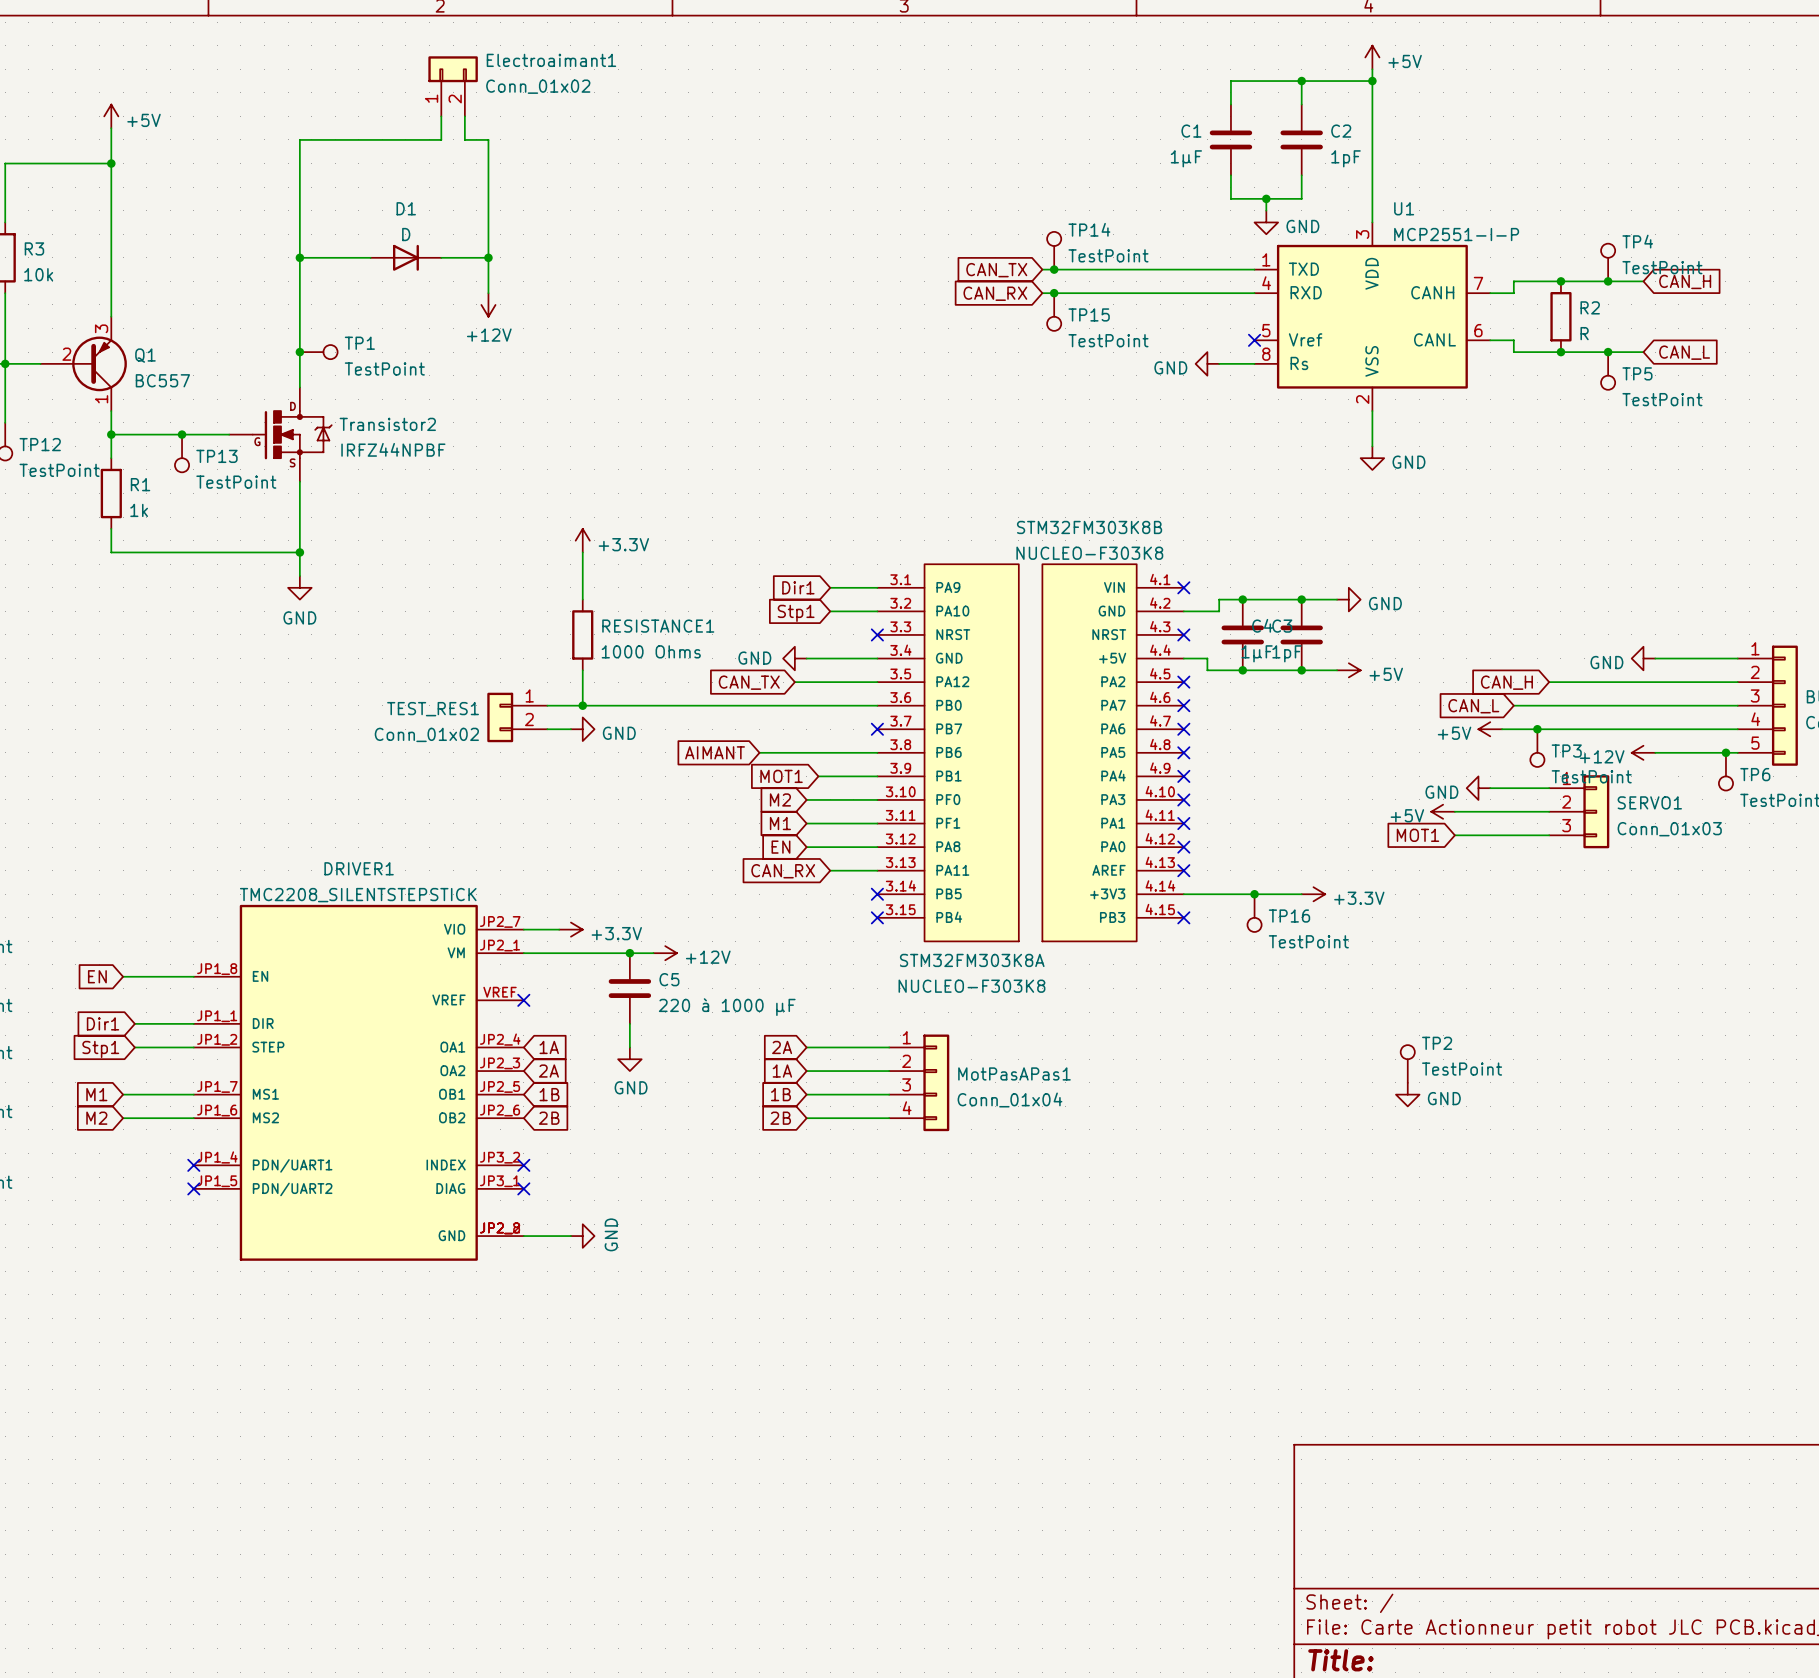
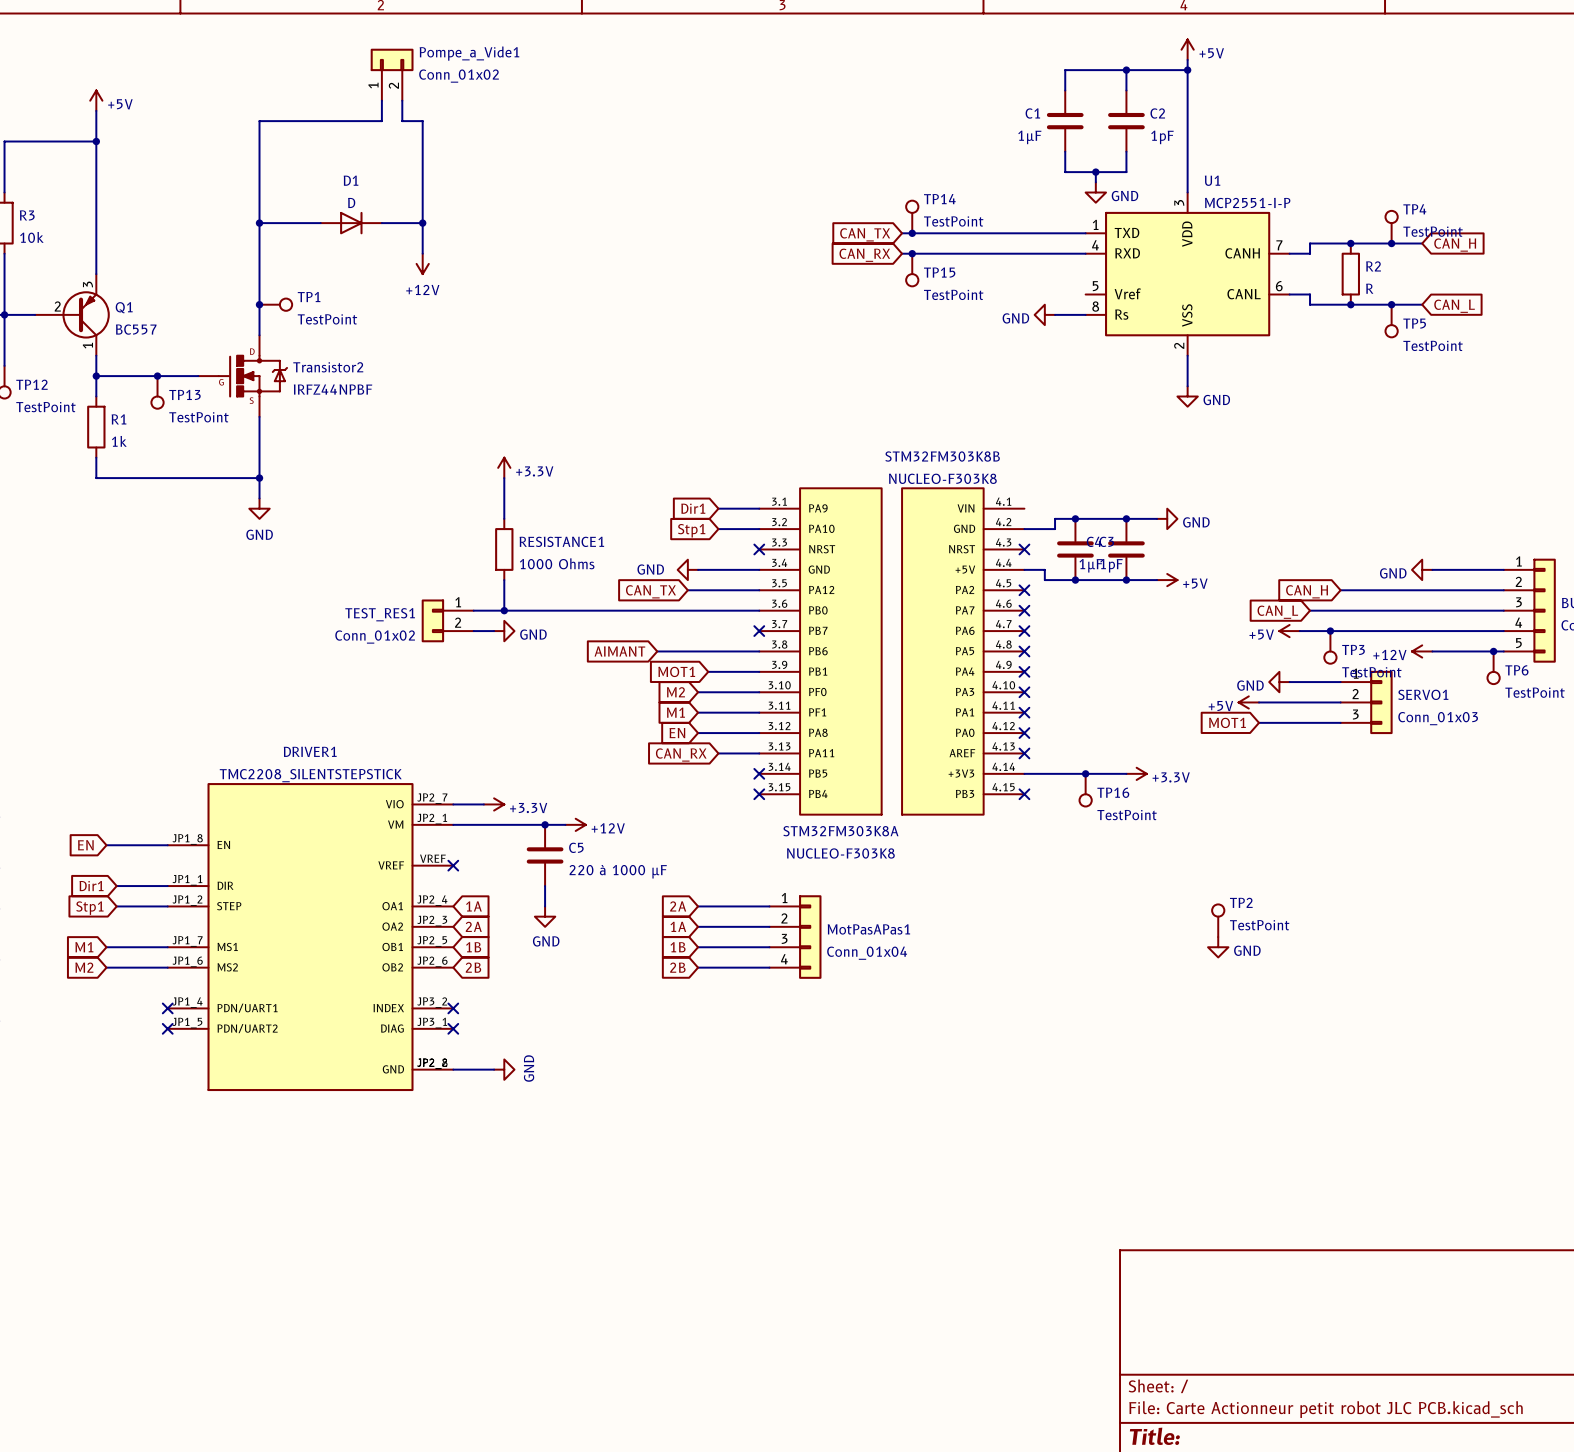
Electroaimant1 name: Electroaimant1 (551, 60) -> Pompe_a_Vide1 (469, 53)
no-connect mark: (1254, 340) -> none
no-connect mark: (1183, 587) -> none

